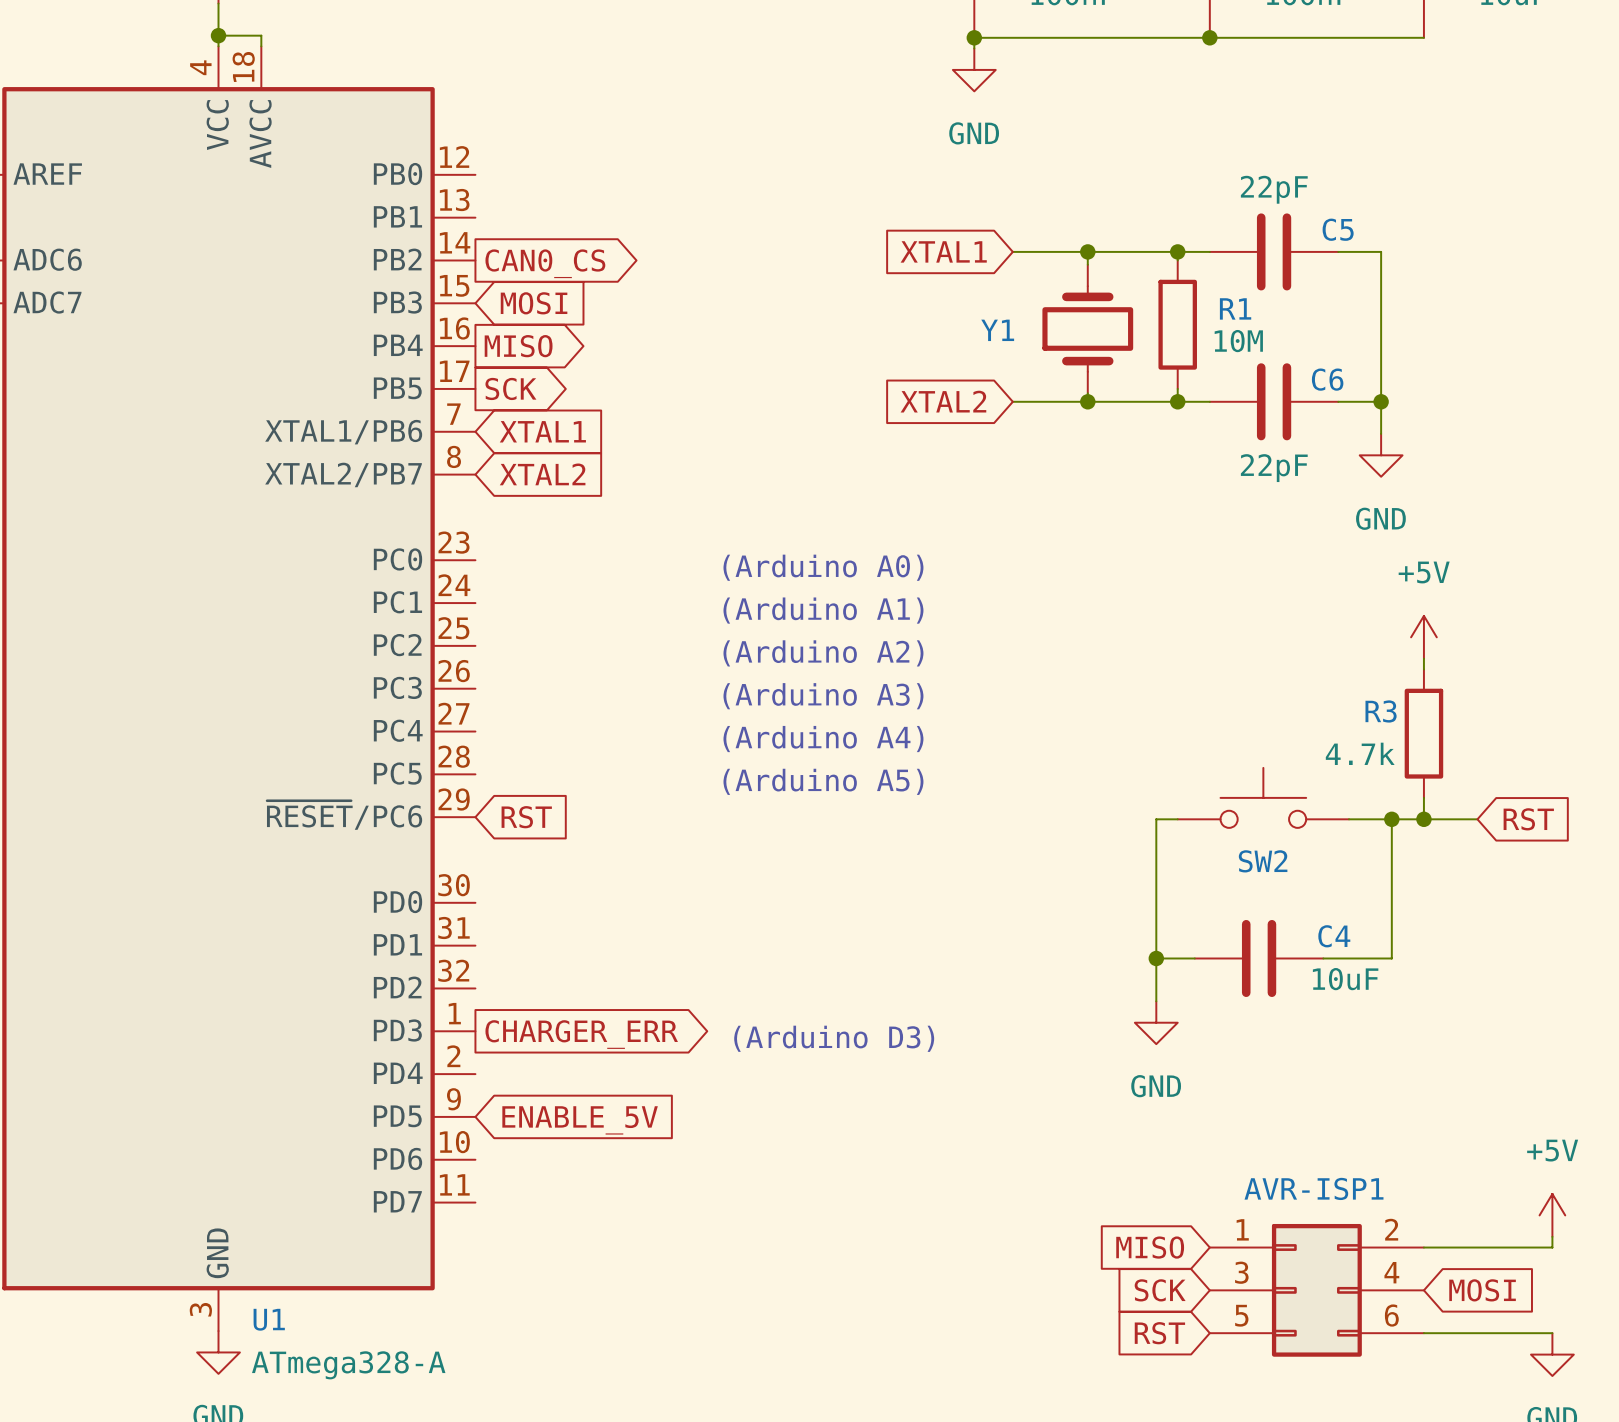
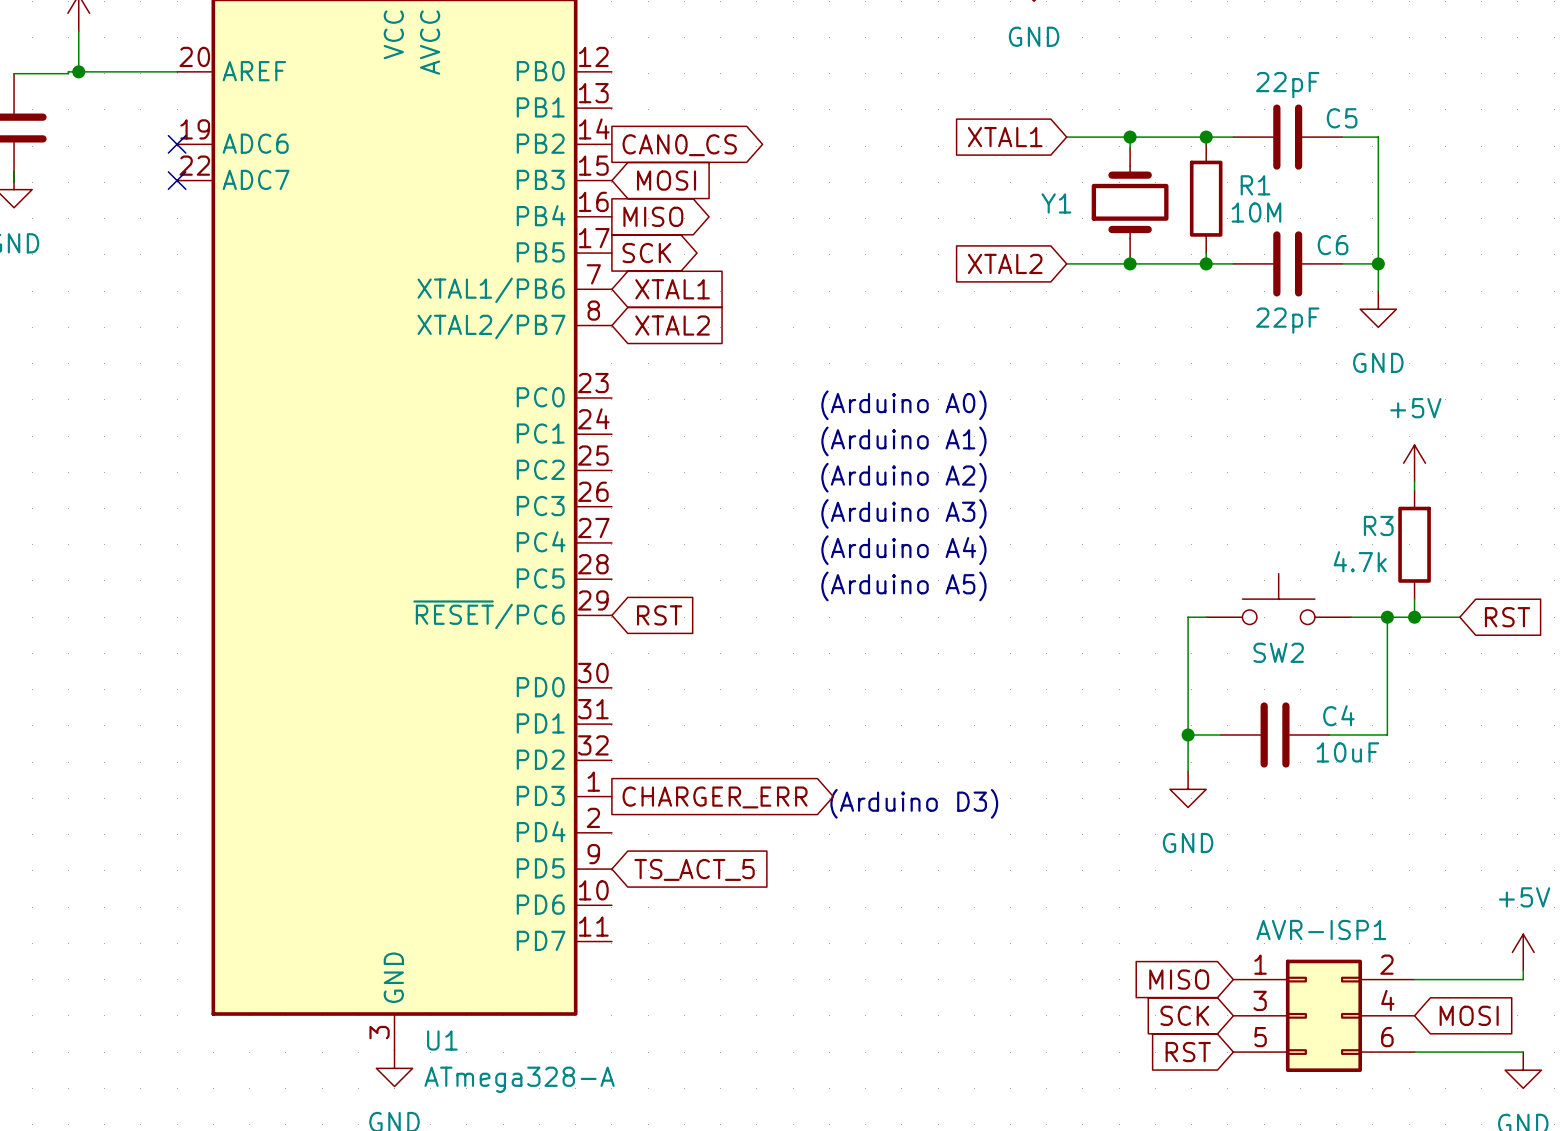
global label: ENABLE_5V (580, 1120) -> TS_ACT_5 (694, 869)

